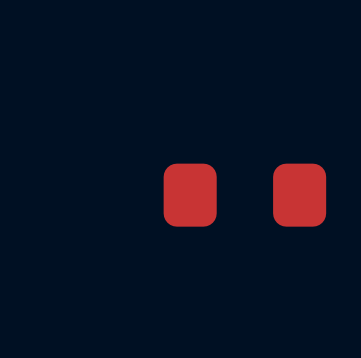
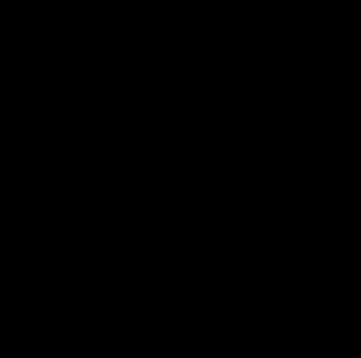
part: (244, 195) -> none

